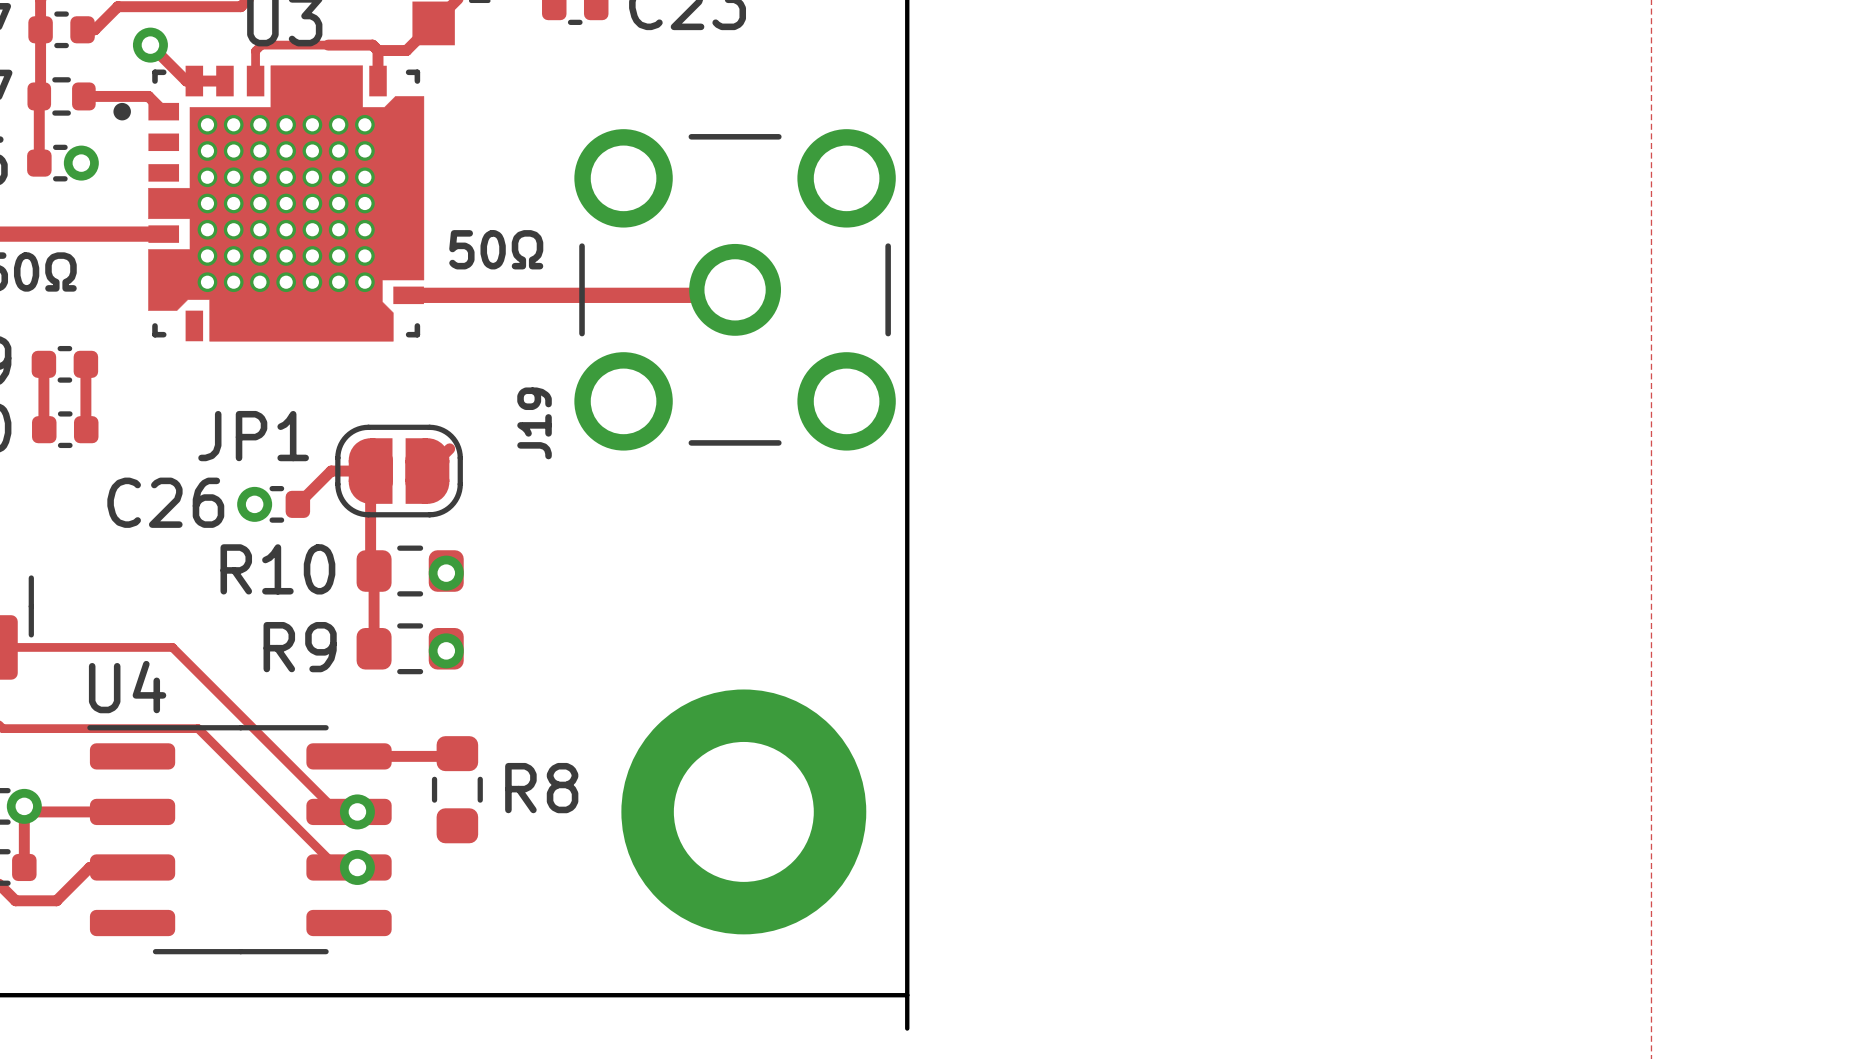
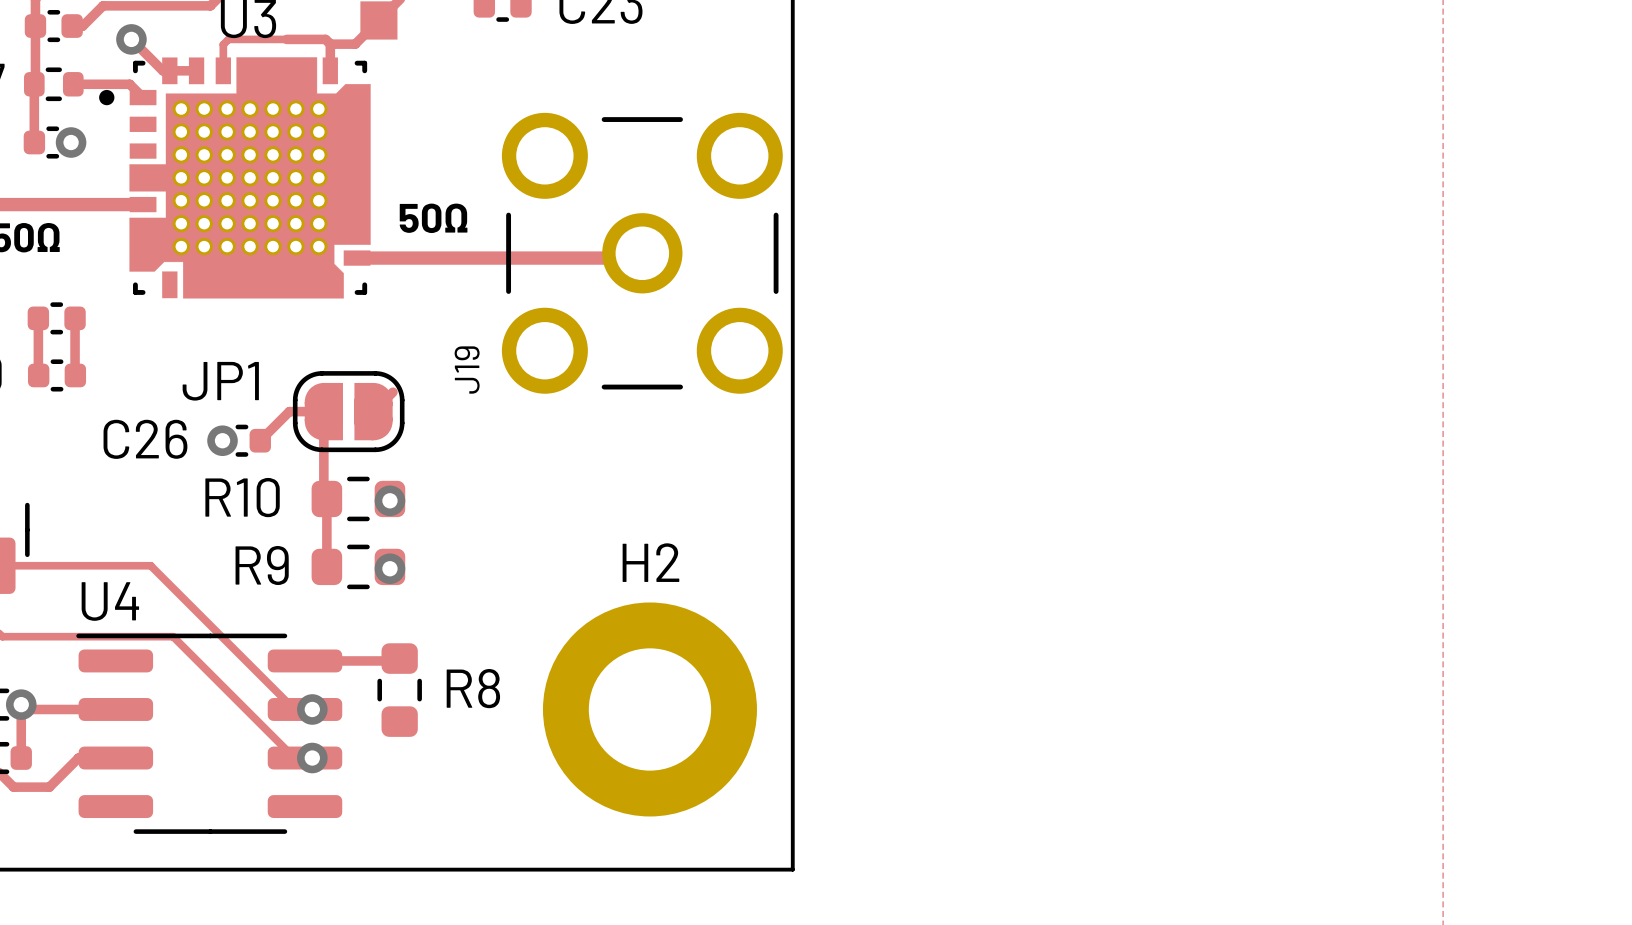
H2 name: none -> H2 (650, 562)
board edge: (907, 995) (907, 1028) -> none

